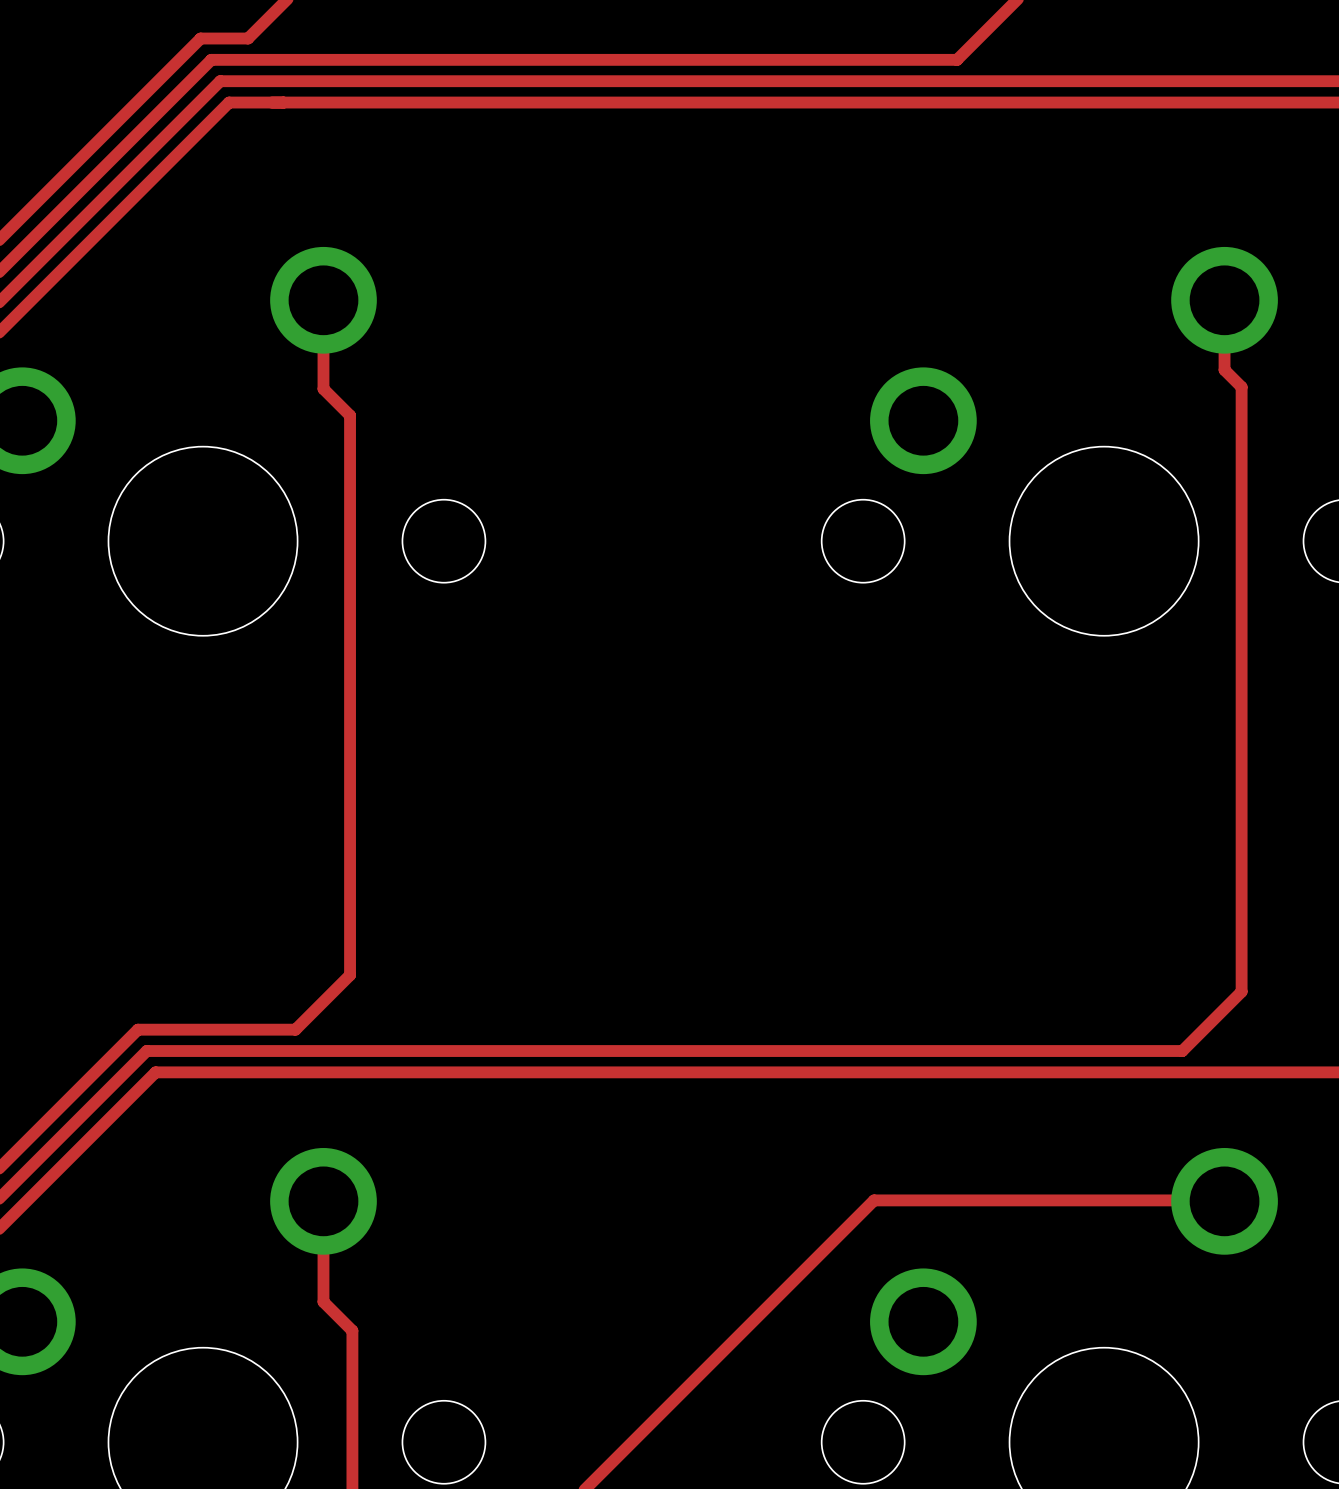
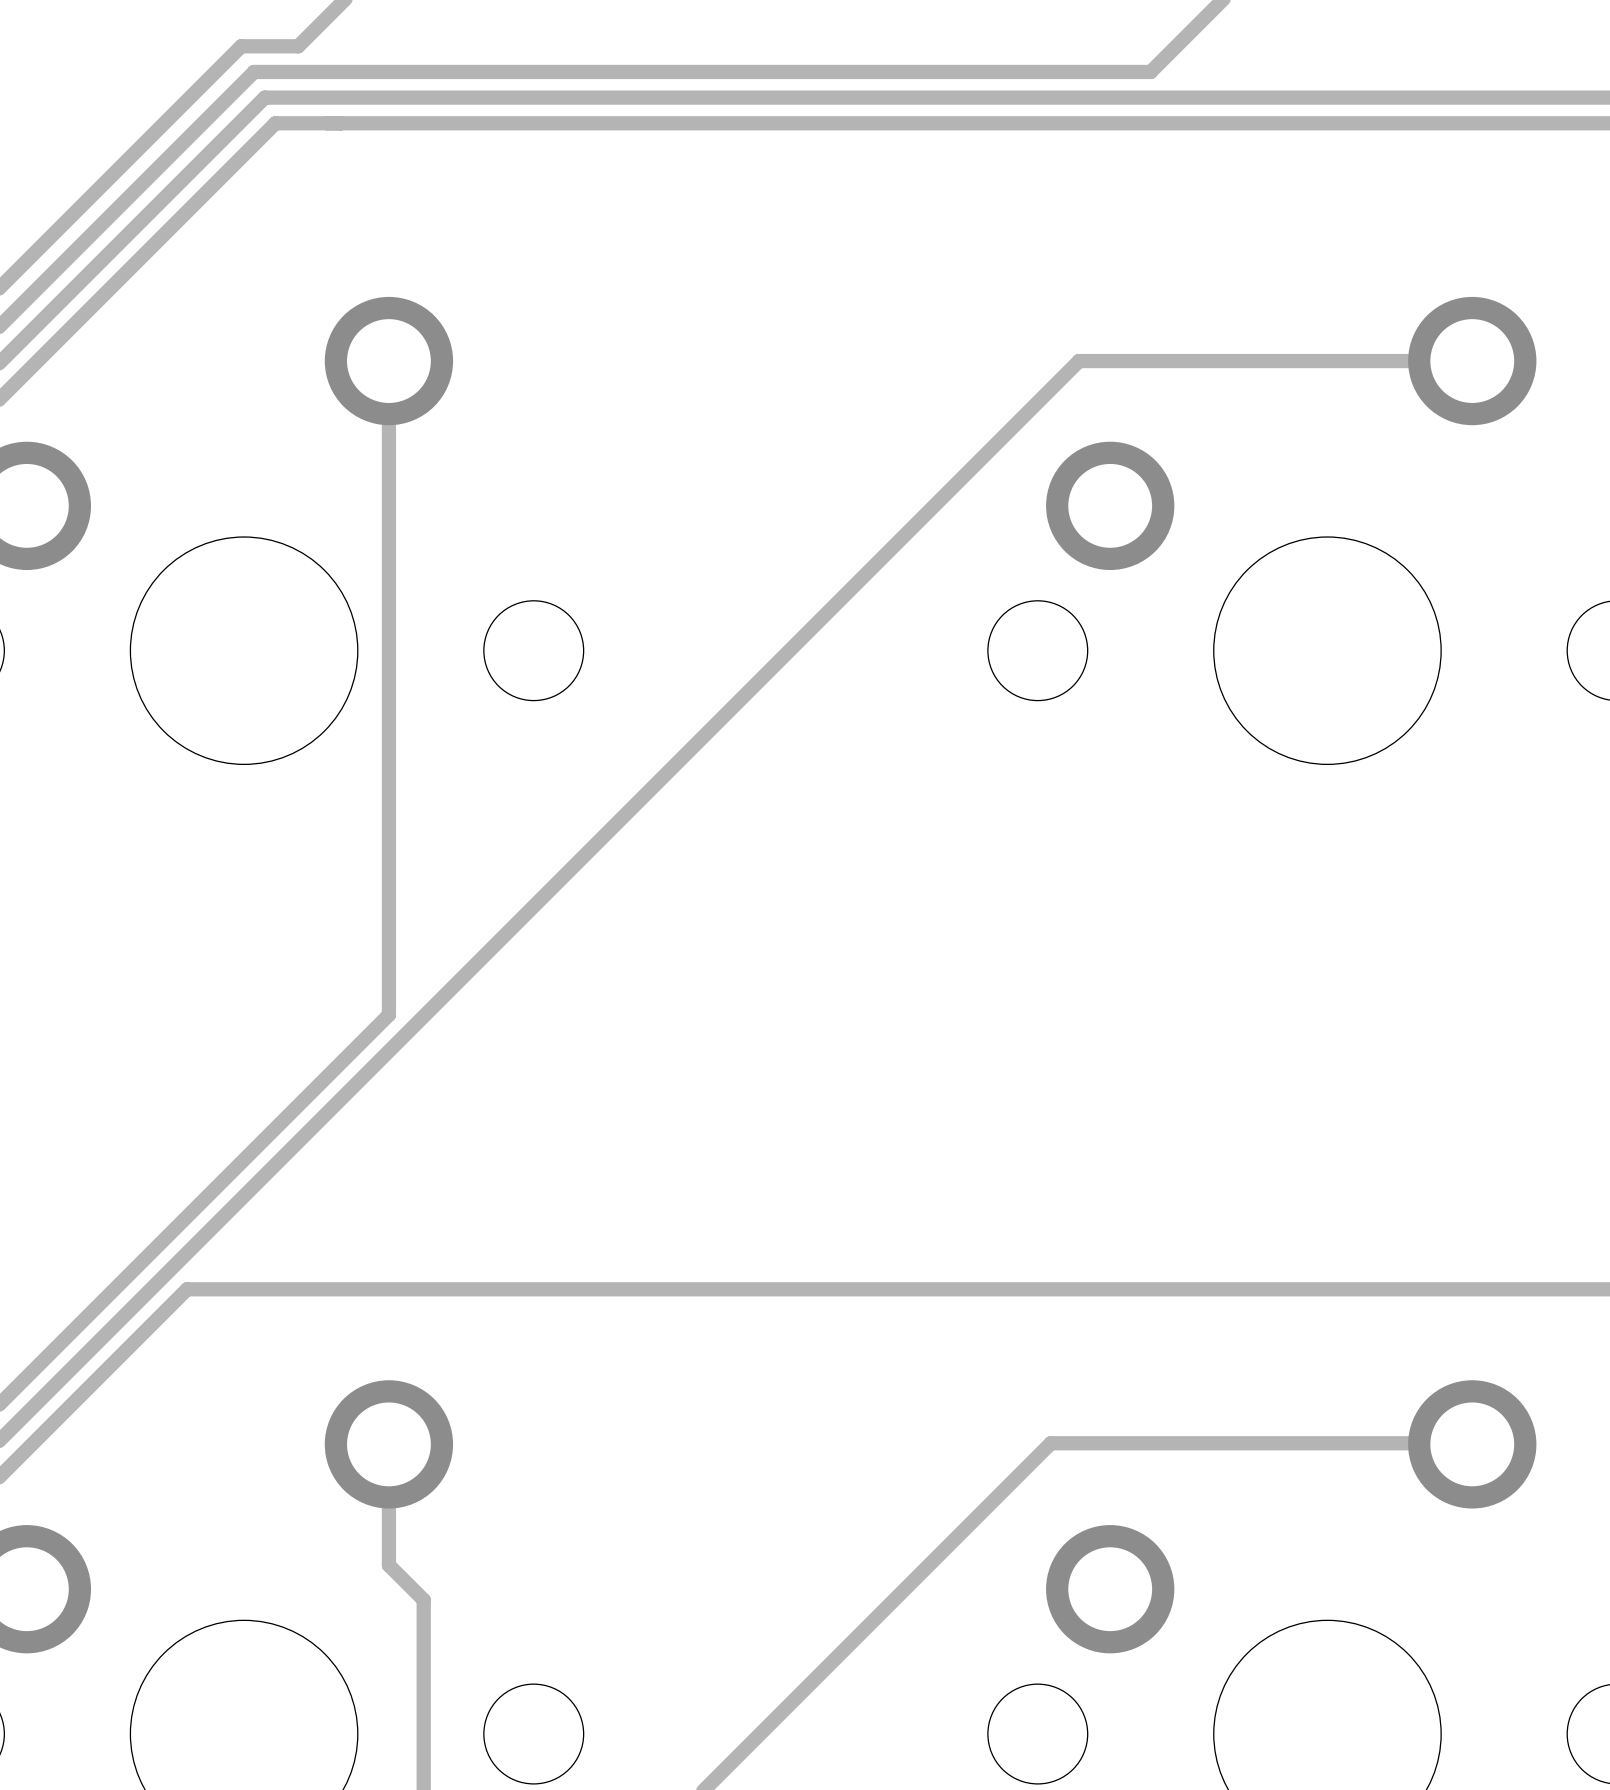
track: (1224, 300) (1224, 370) (1241, 387) (1241, 991) (1182, 1051) (146, 1051) -> (1472, 361) (1079, 361) (176, 1263)
track: (323, 388) (350, 415) (350, 975) (295, 1029) (137, 1029) -> (388, 467) (388, 1014) (165, 1237)

